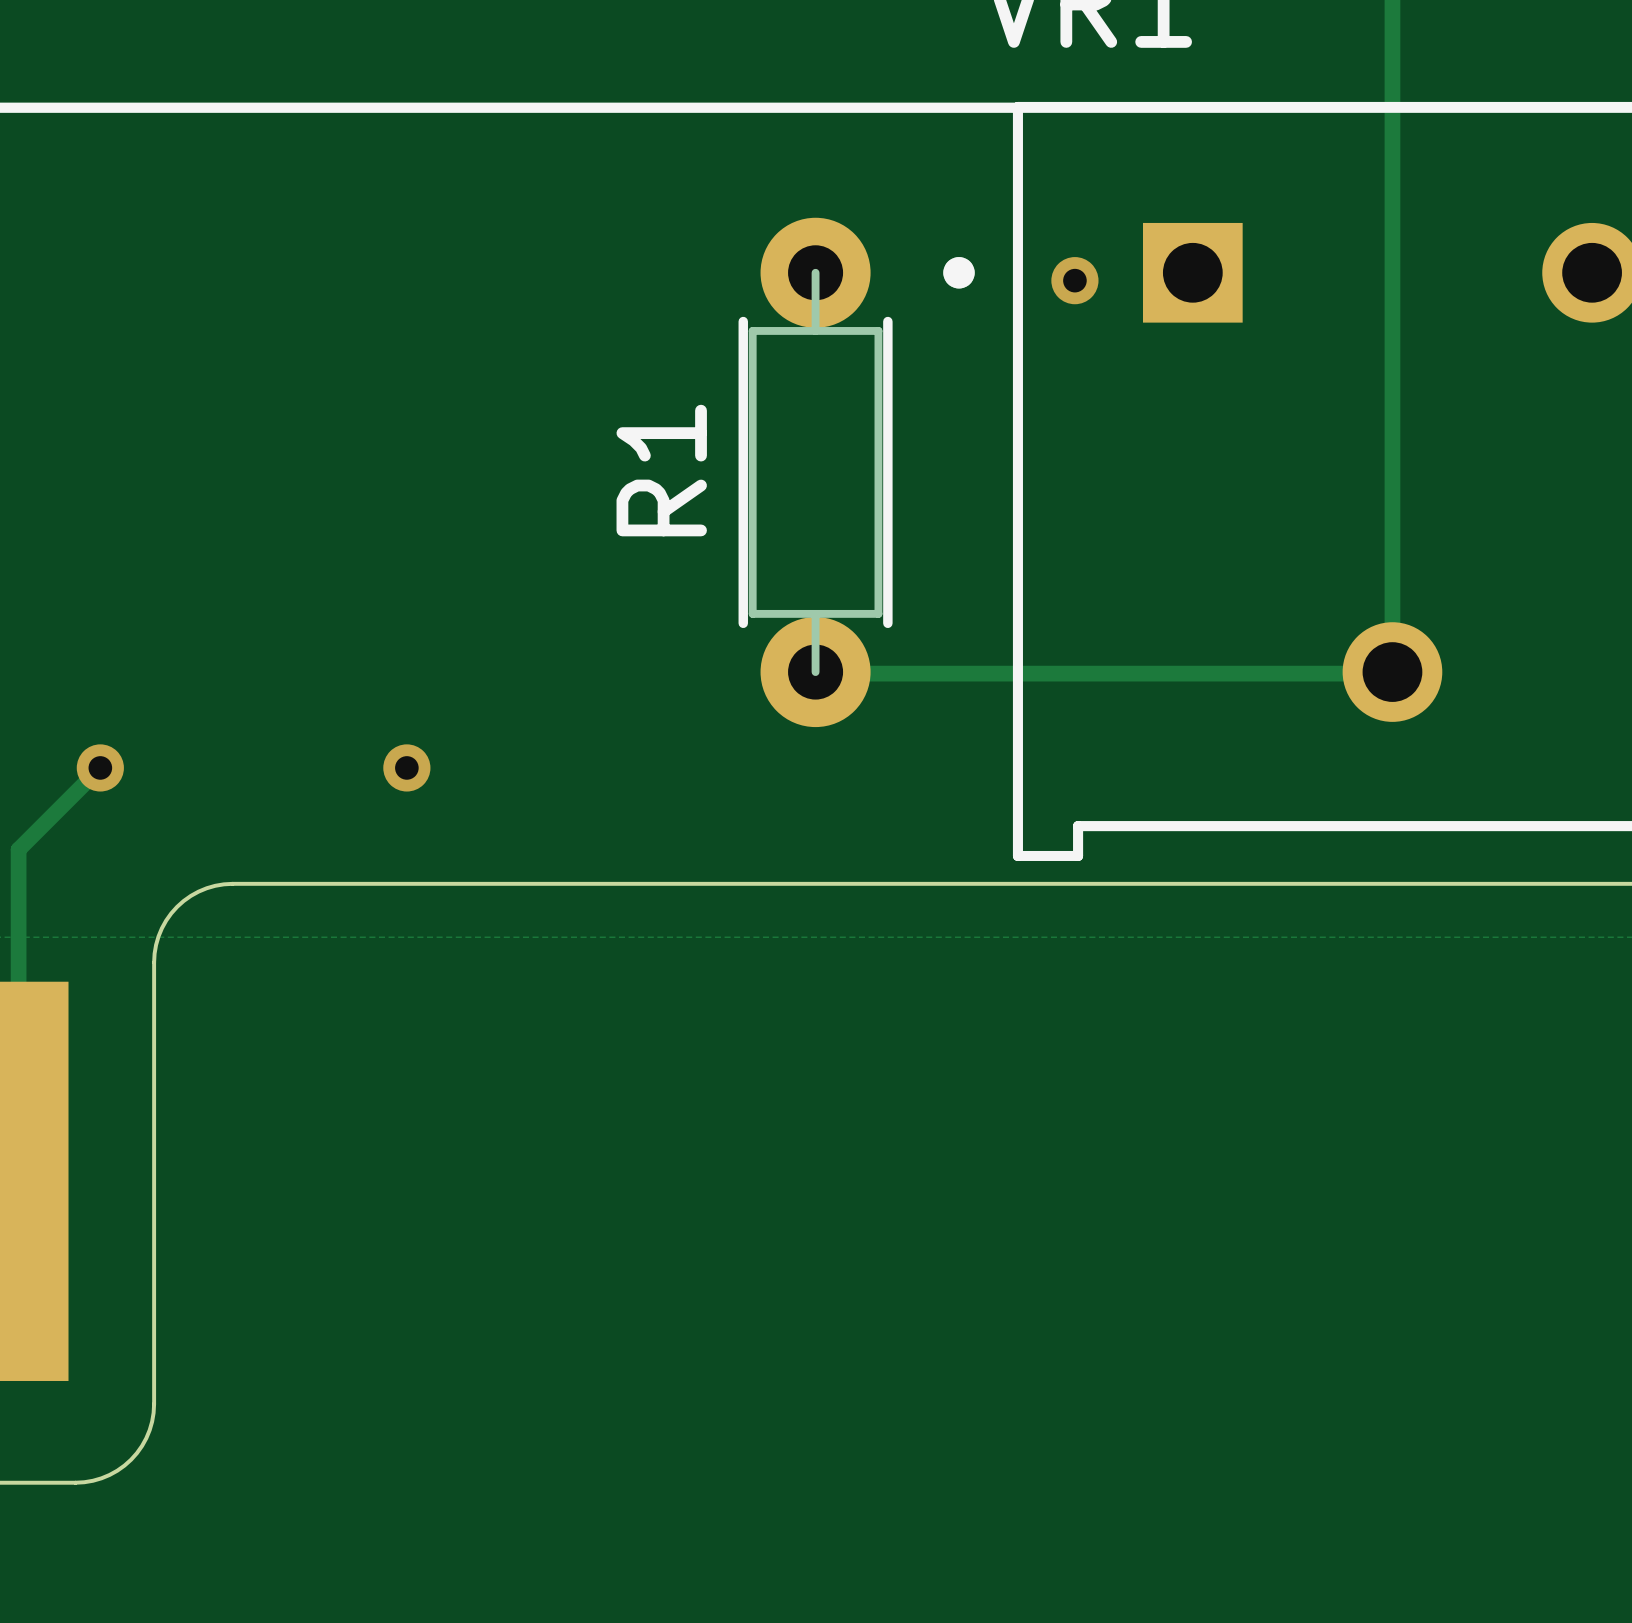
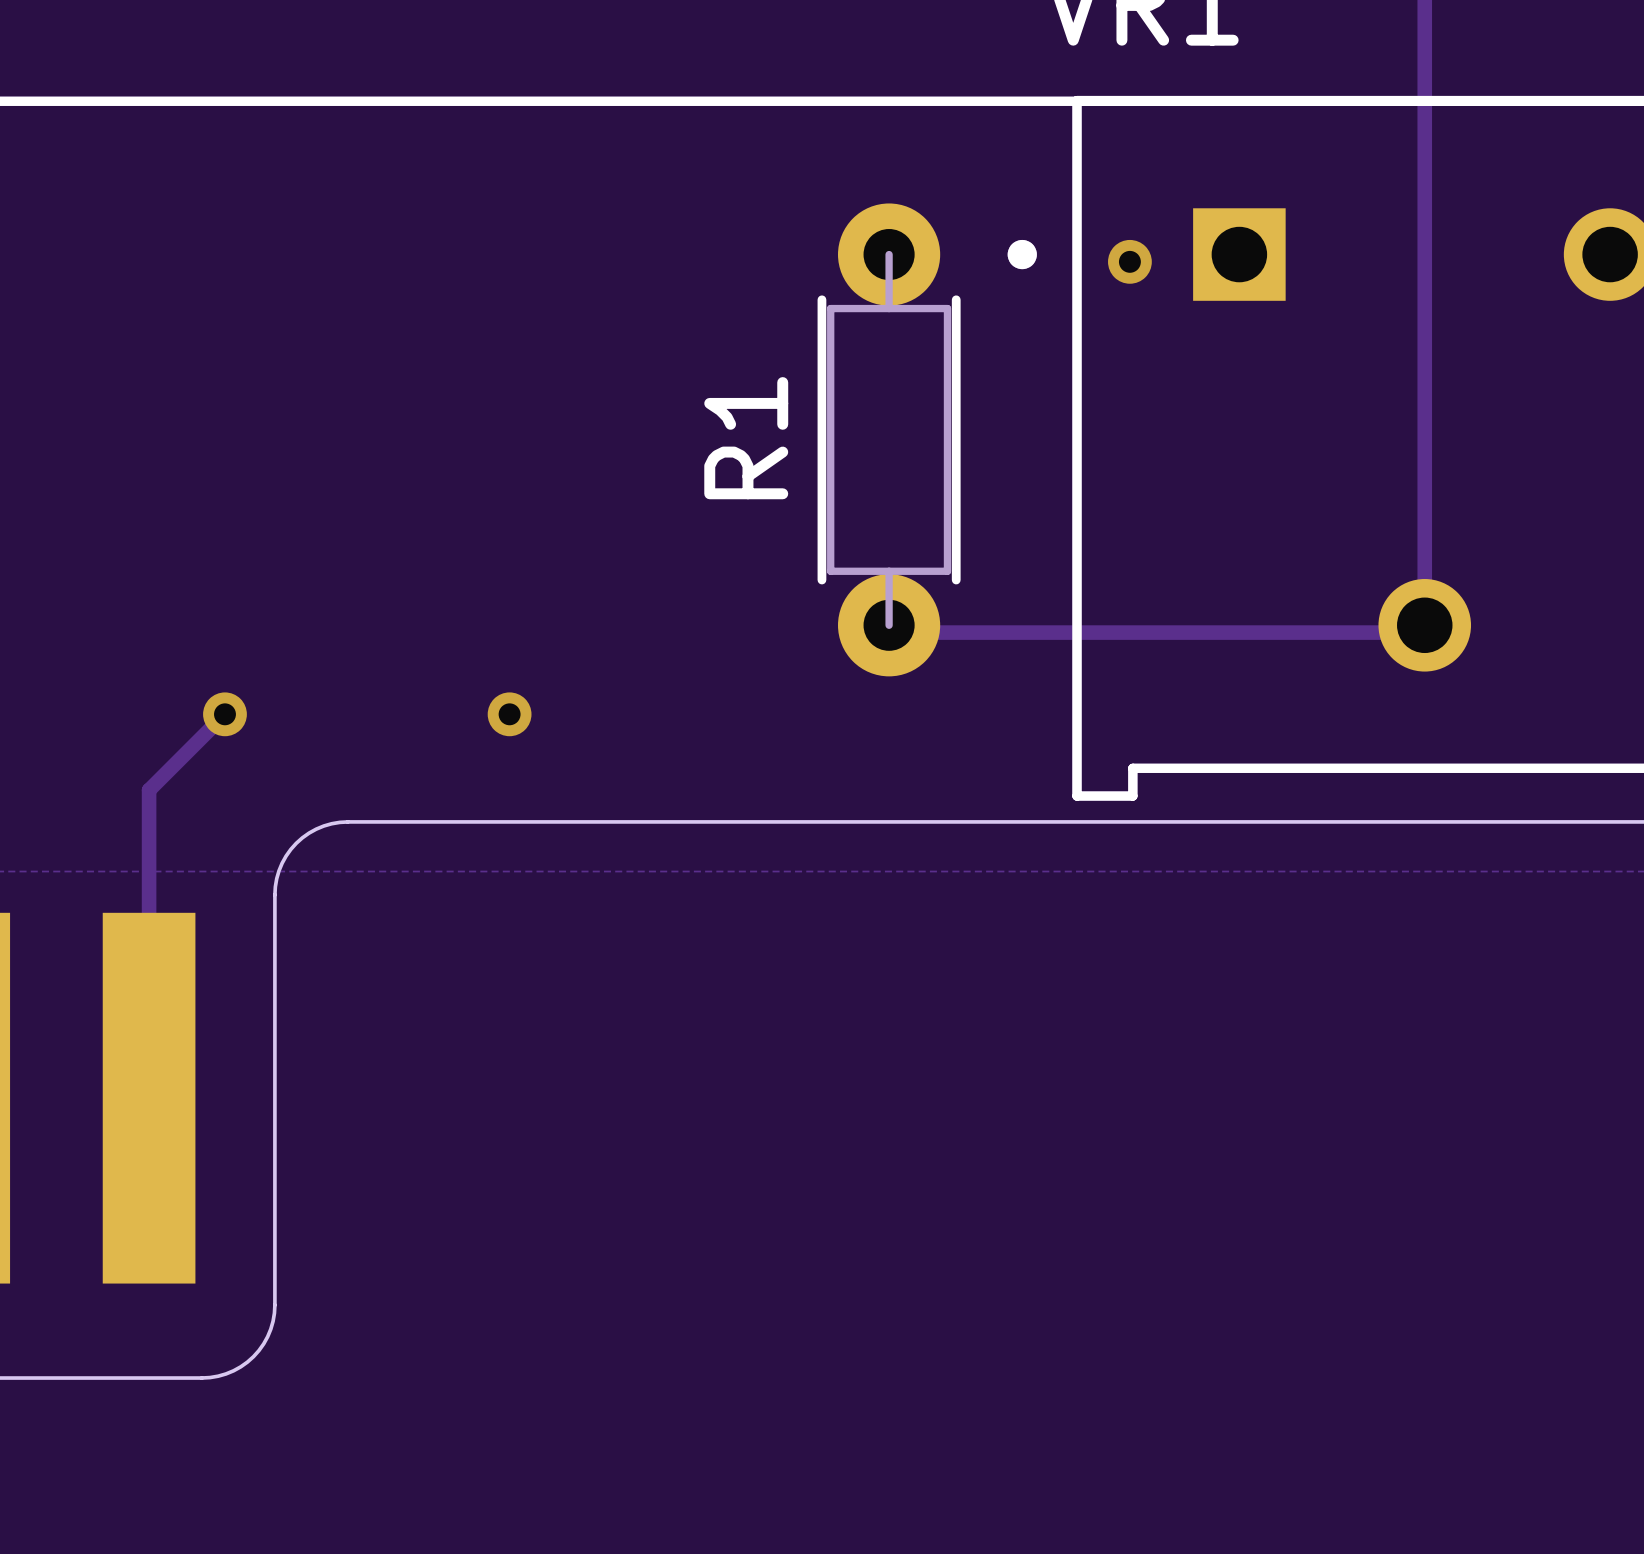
track: (815, 672) (817, 673) (1392, 673) -> (889, 639) (896, 632) (1424, 632) (1424, 626)

